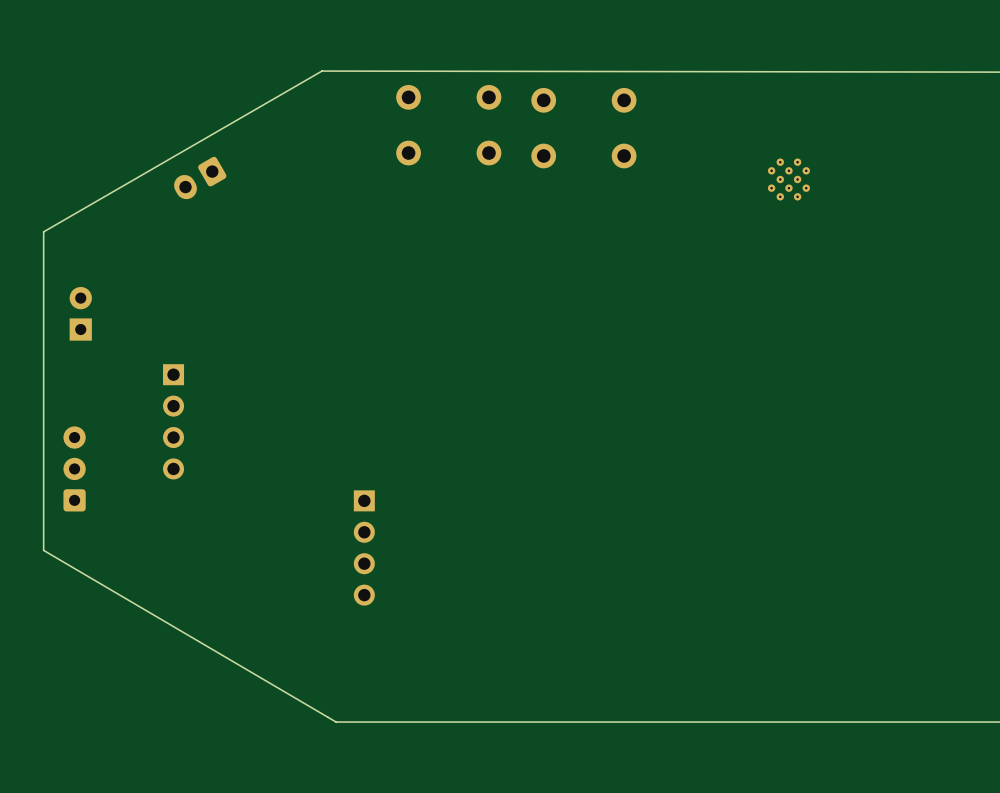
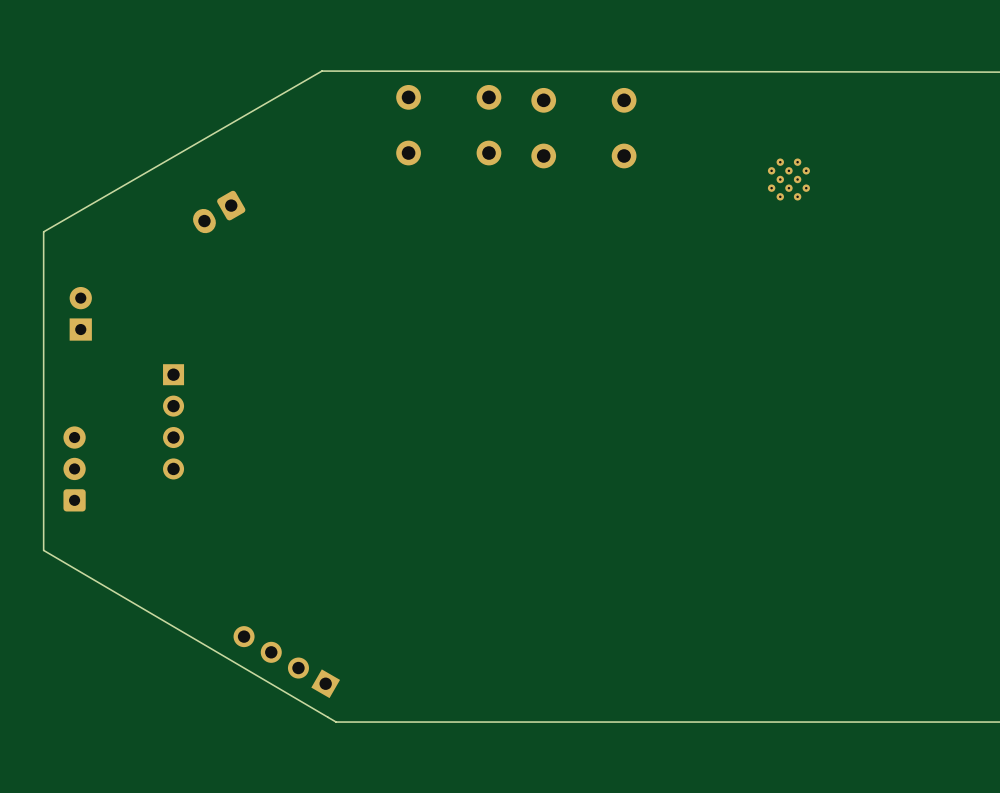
part position: (200, 177) -> (219, 211)
part: (364, 547) -> none
part: none -> (286, 662)

